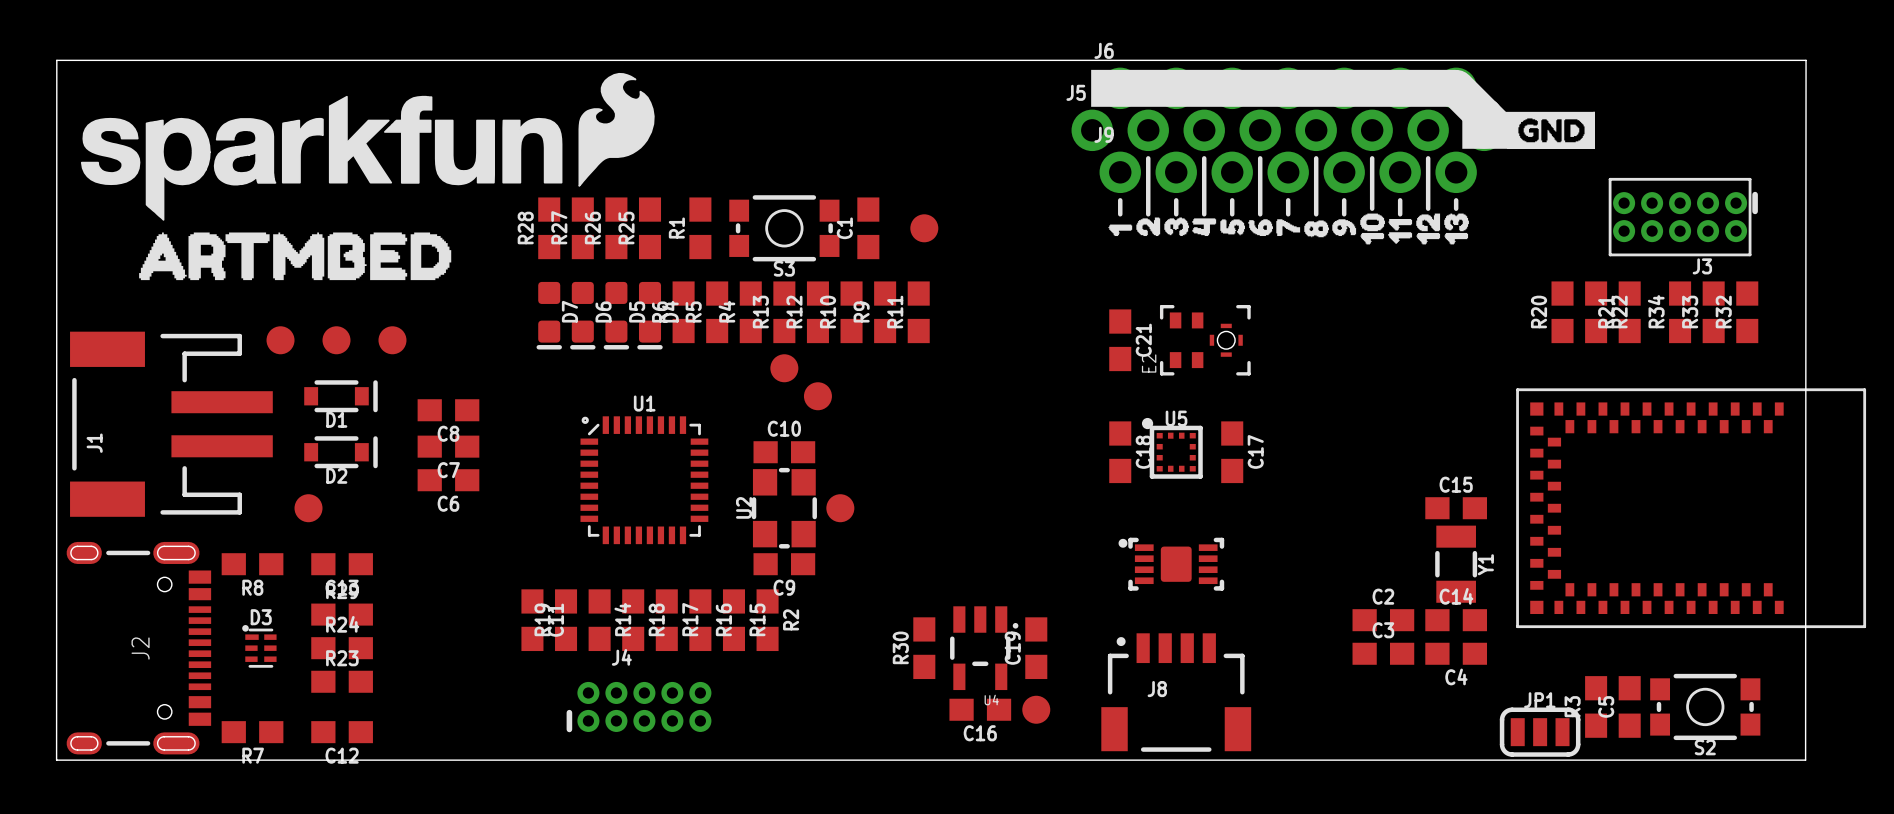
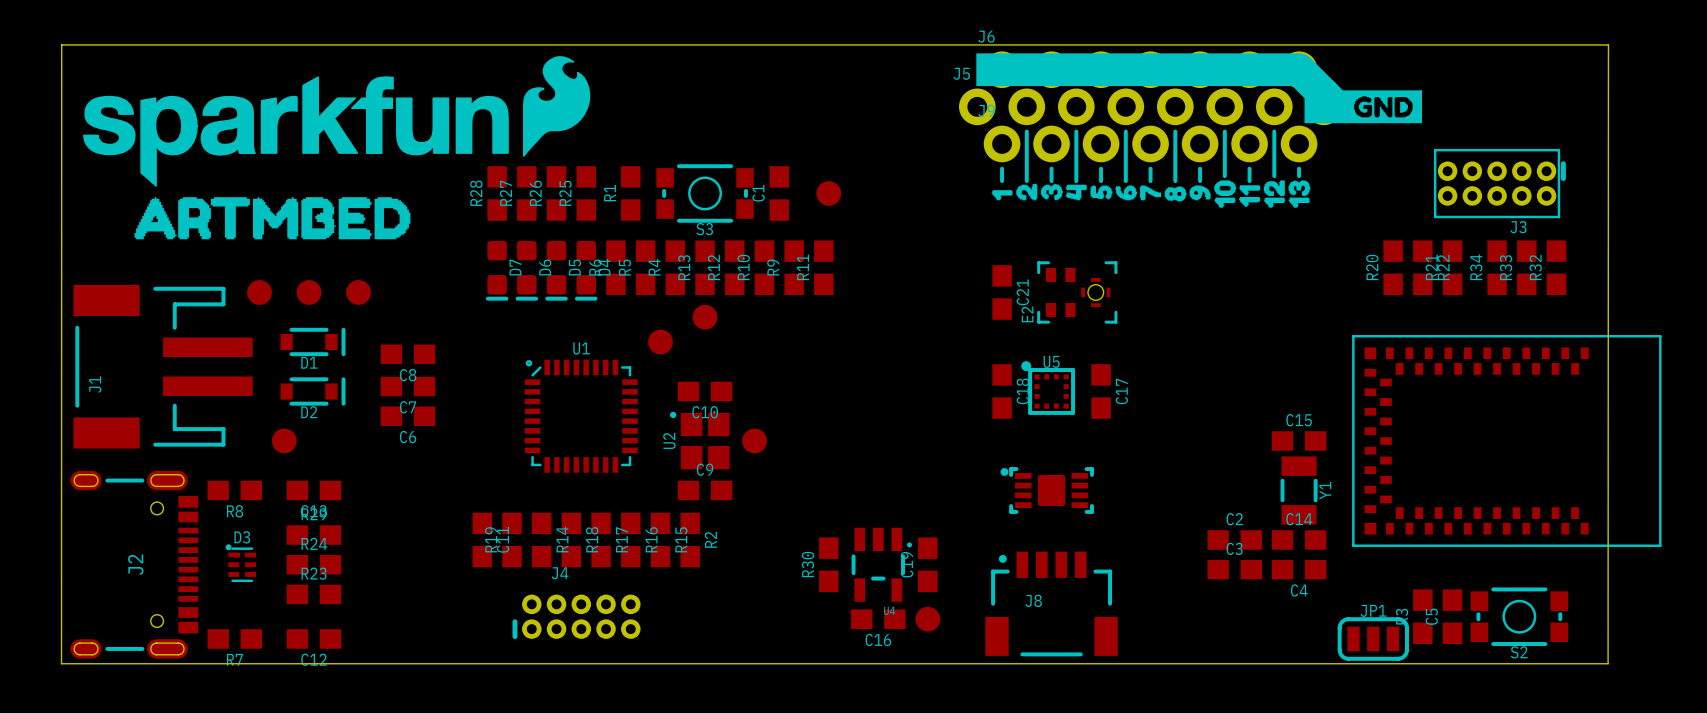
part position: (817, 396) -> (660, 341)
C10 name position: C10 (784, 428) -> C10 (705, 412)
U2 footprint: [751, 467, 817, 549] -> [670, 411, 730, 470]
C9 name position: C9 (784, 587) -> C9 (705, 469)

